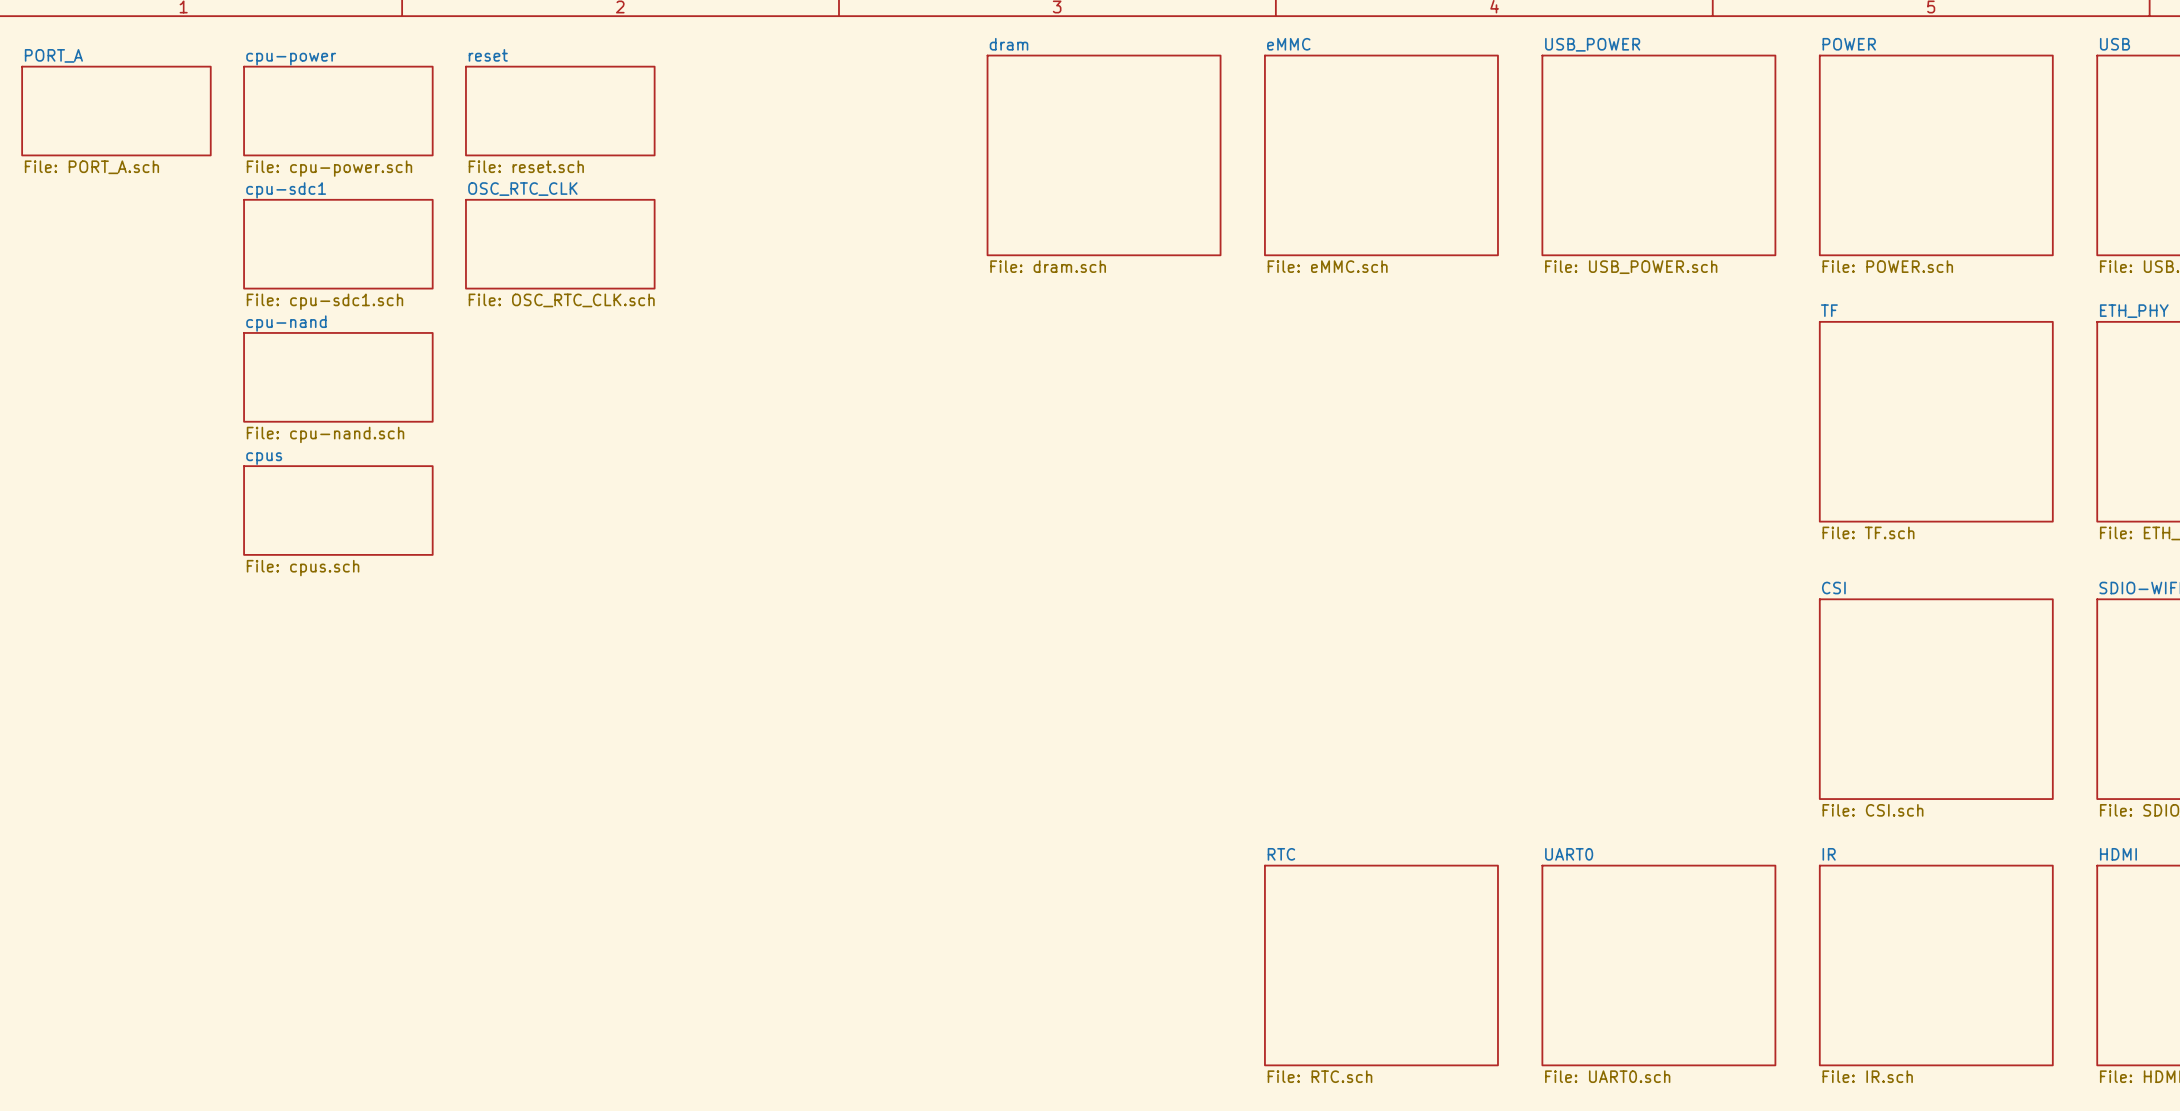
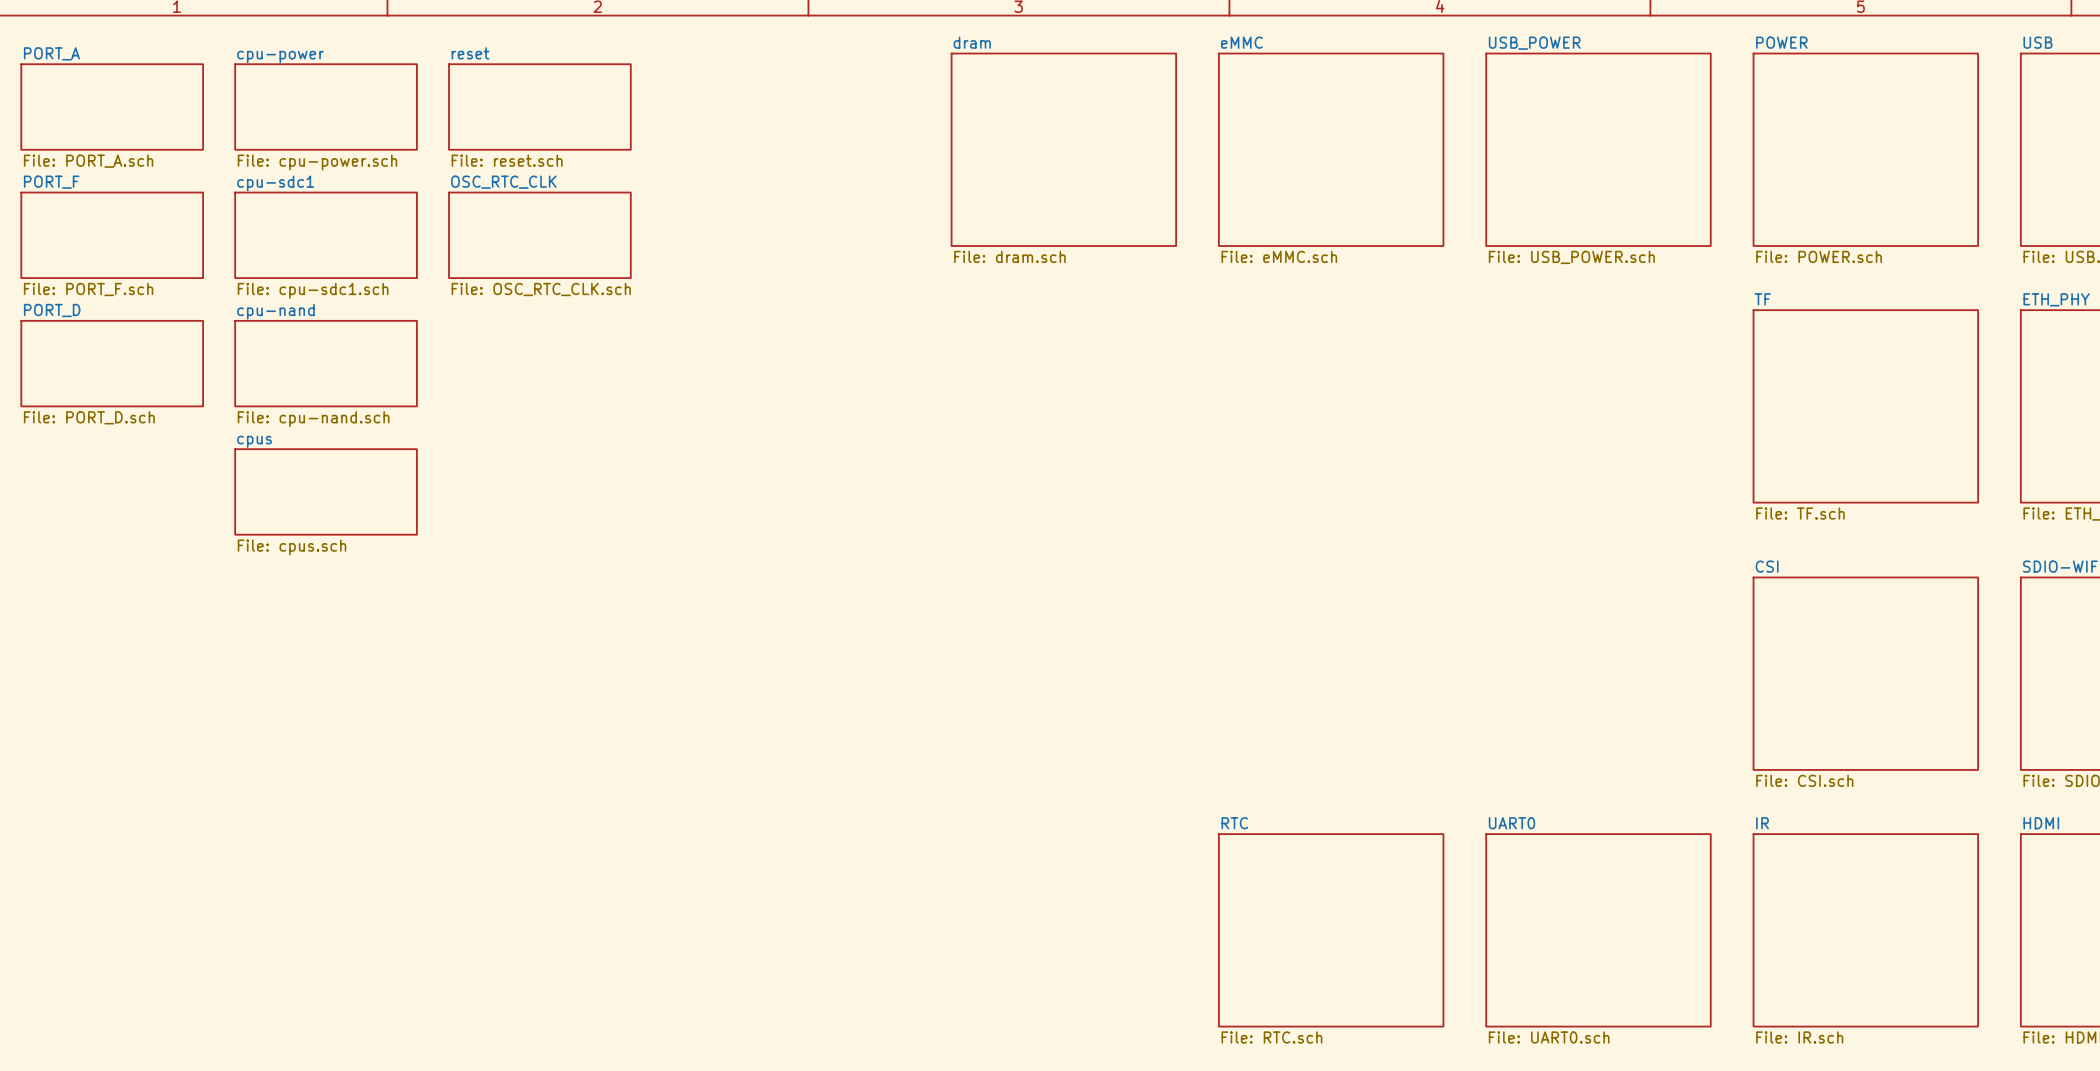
sheet PORT_F: none -> File: PORT_F.sch (112, 235)
sheet PORT_D: none -> File: PORT_D.sch (112, 363)

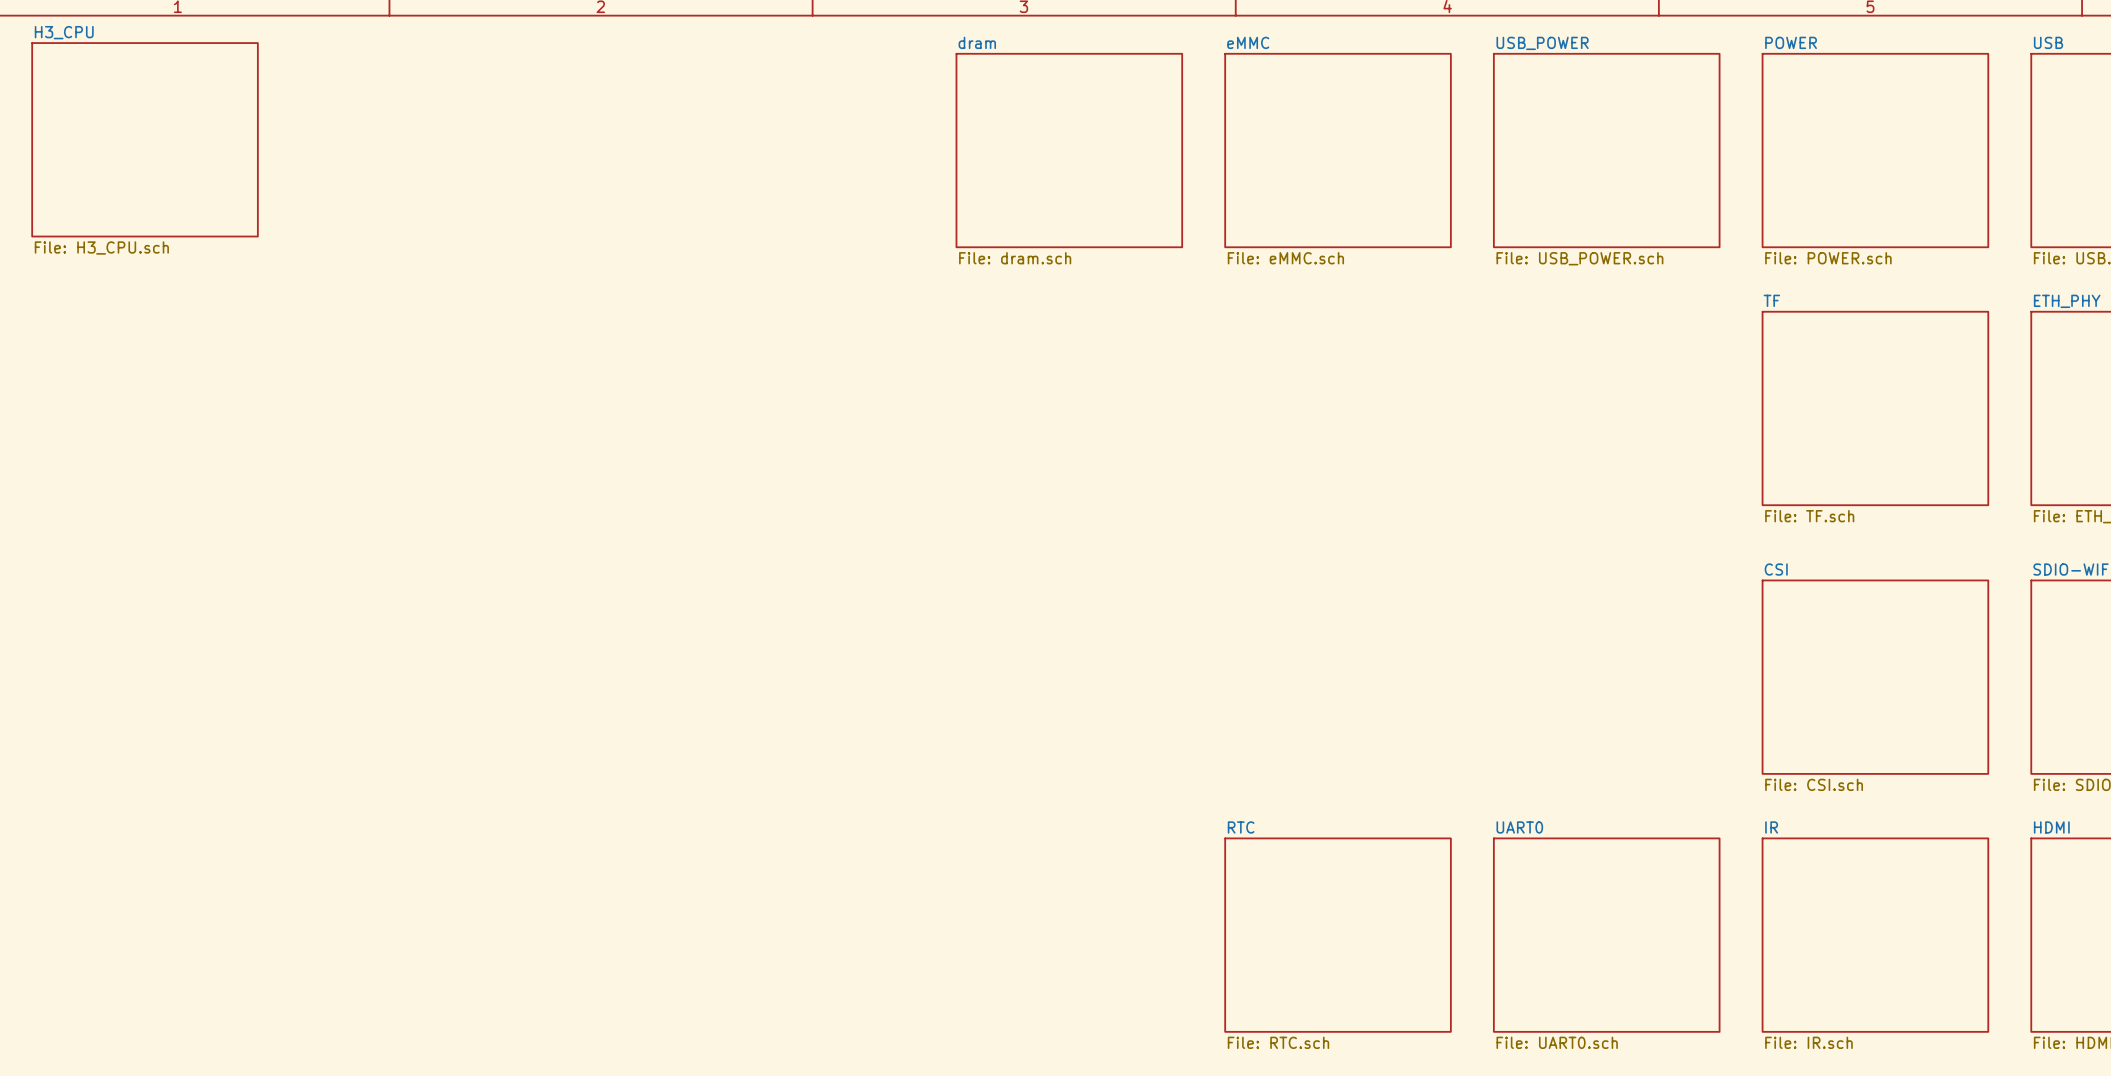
sheet PORT_A: File: PORT_A.sch (112, 106) -> none
sheet cpu-power: File: cpu-power.sch (326, 106) -> none
sheet reset: File: reset.sch (539, 106) -> none
sheet H3_CPU: none -> File: H3_CPU.sch (145, 139)
sheet PORT_F: File: PORT_F.sch (112, 235) -> none
sheet cpu-sdc1: File: cpu-sdc1.sch (326, 235) -> none
sheet OSC_RTC_CLK: File: OSC_RTC_CLK.sch (539, 235) -> none
sheet PORT_D: File: PORT_D.sch (112, 363) -> none
sheet cpu-nand: File: cpu-nand.sch (326, 363) -> none
sheet cpus: File: cpus.sch (326, 491) -> none

